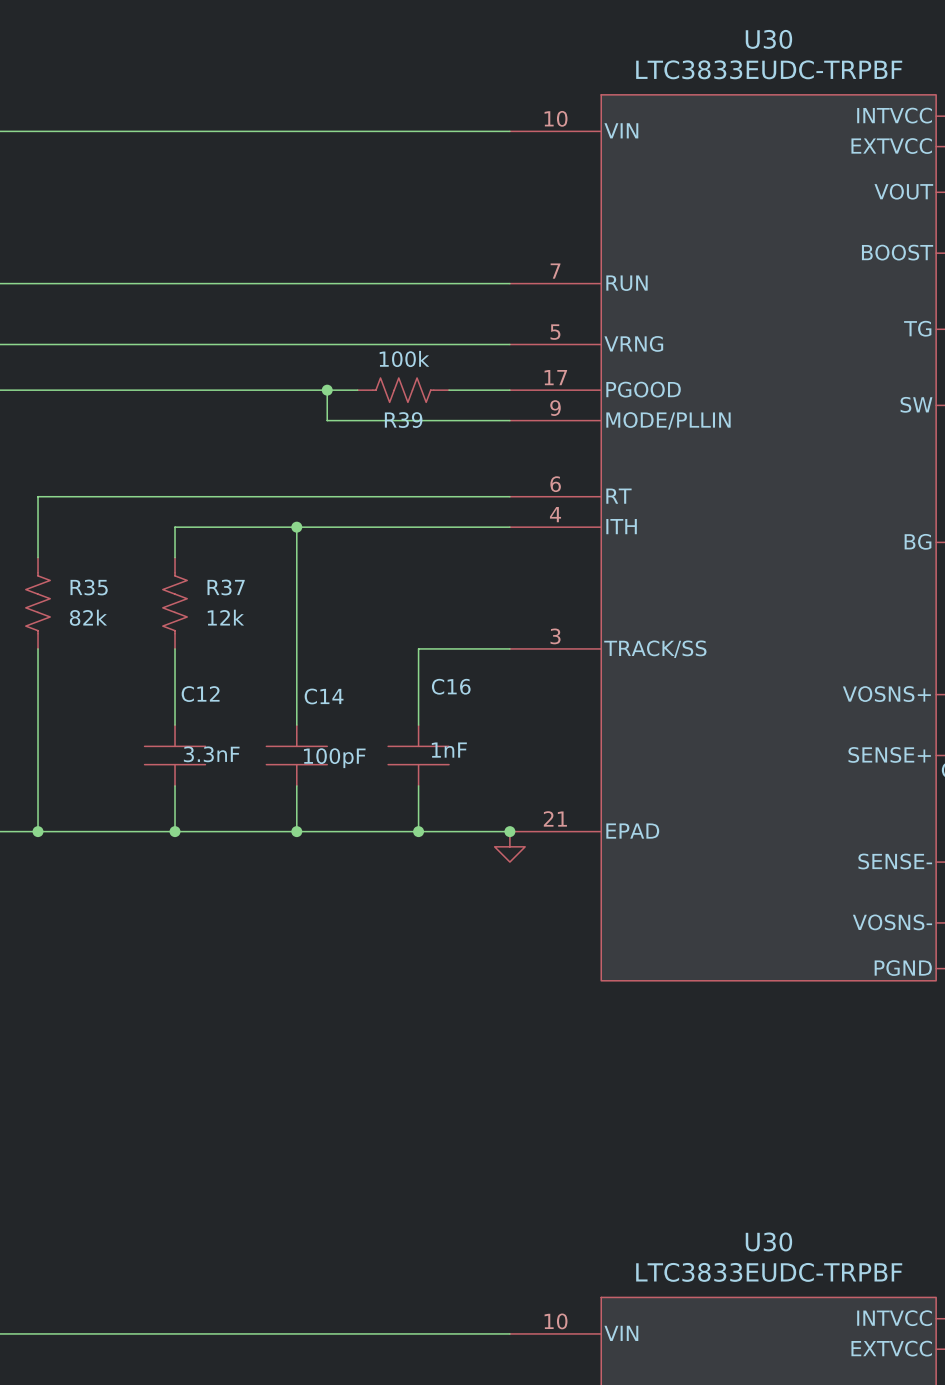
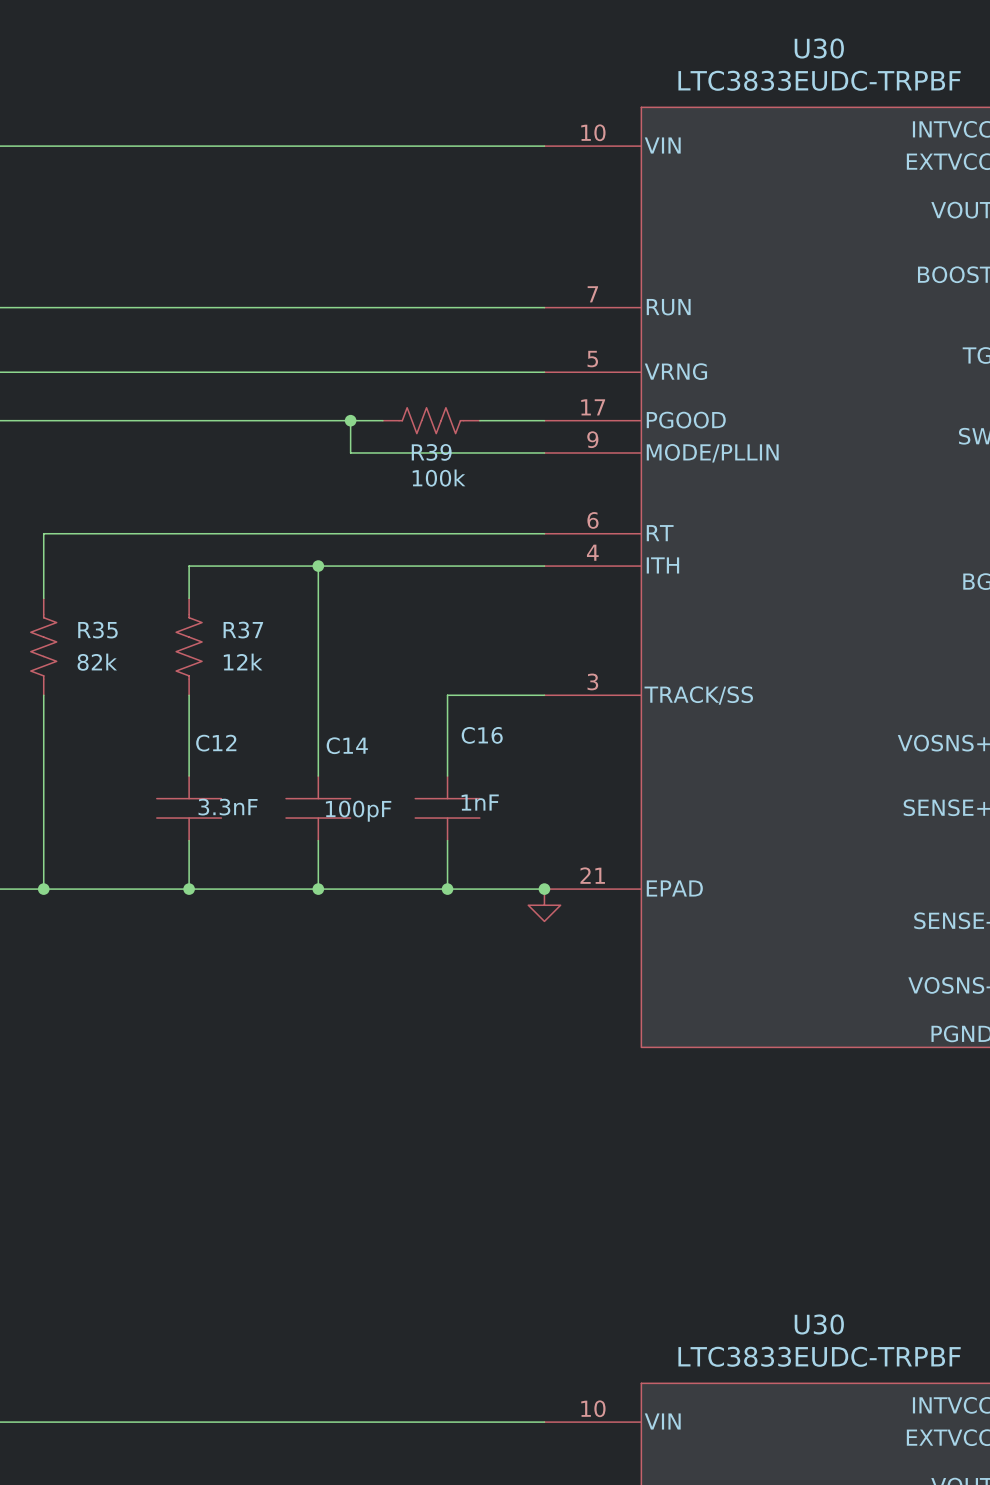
R39 value position: 100k (404, 358) -> 100k (439, 478)

